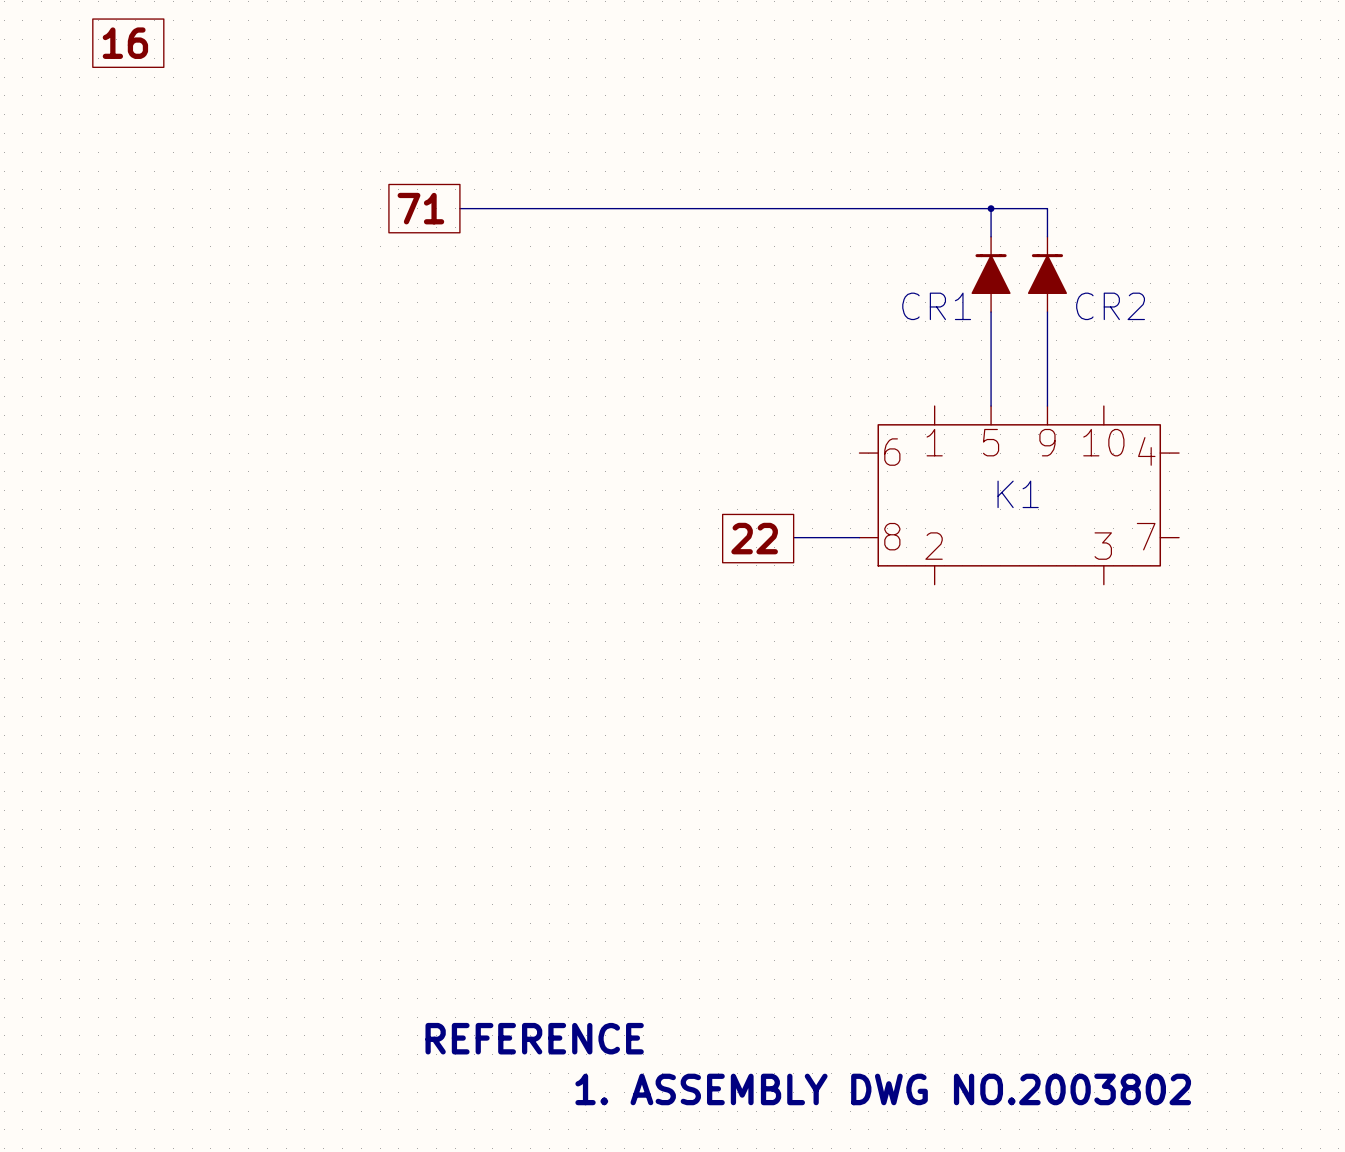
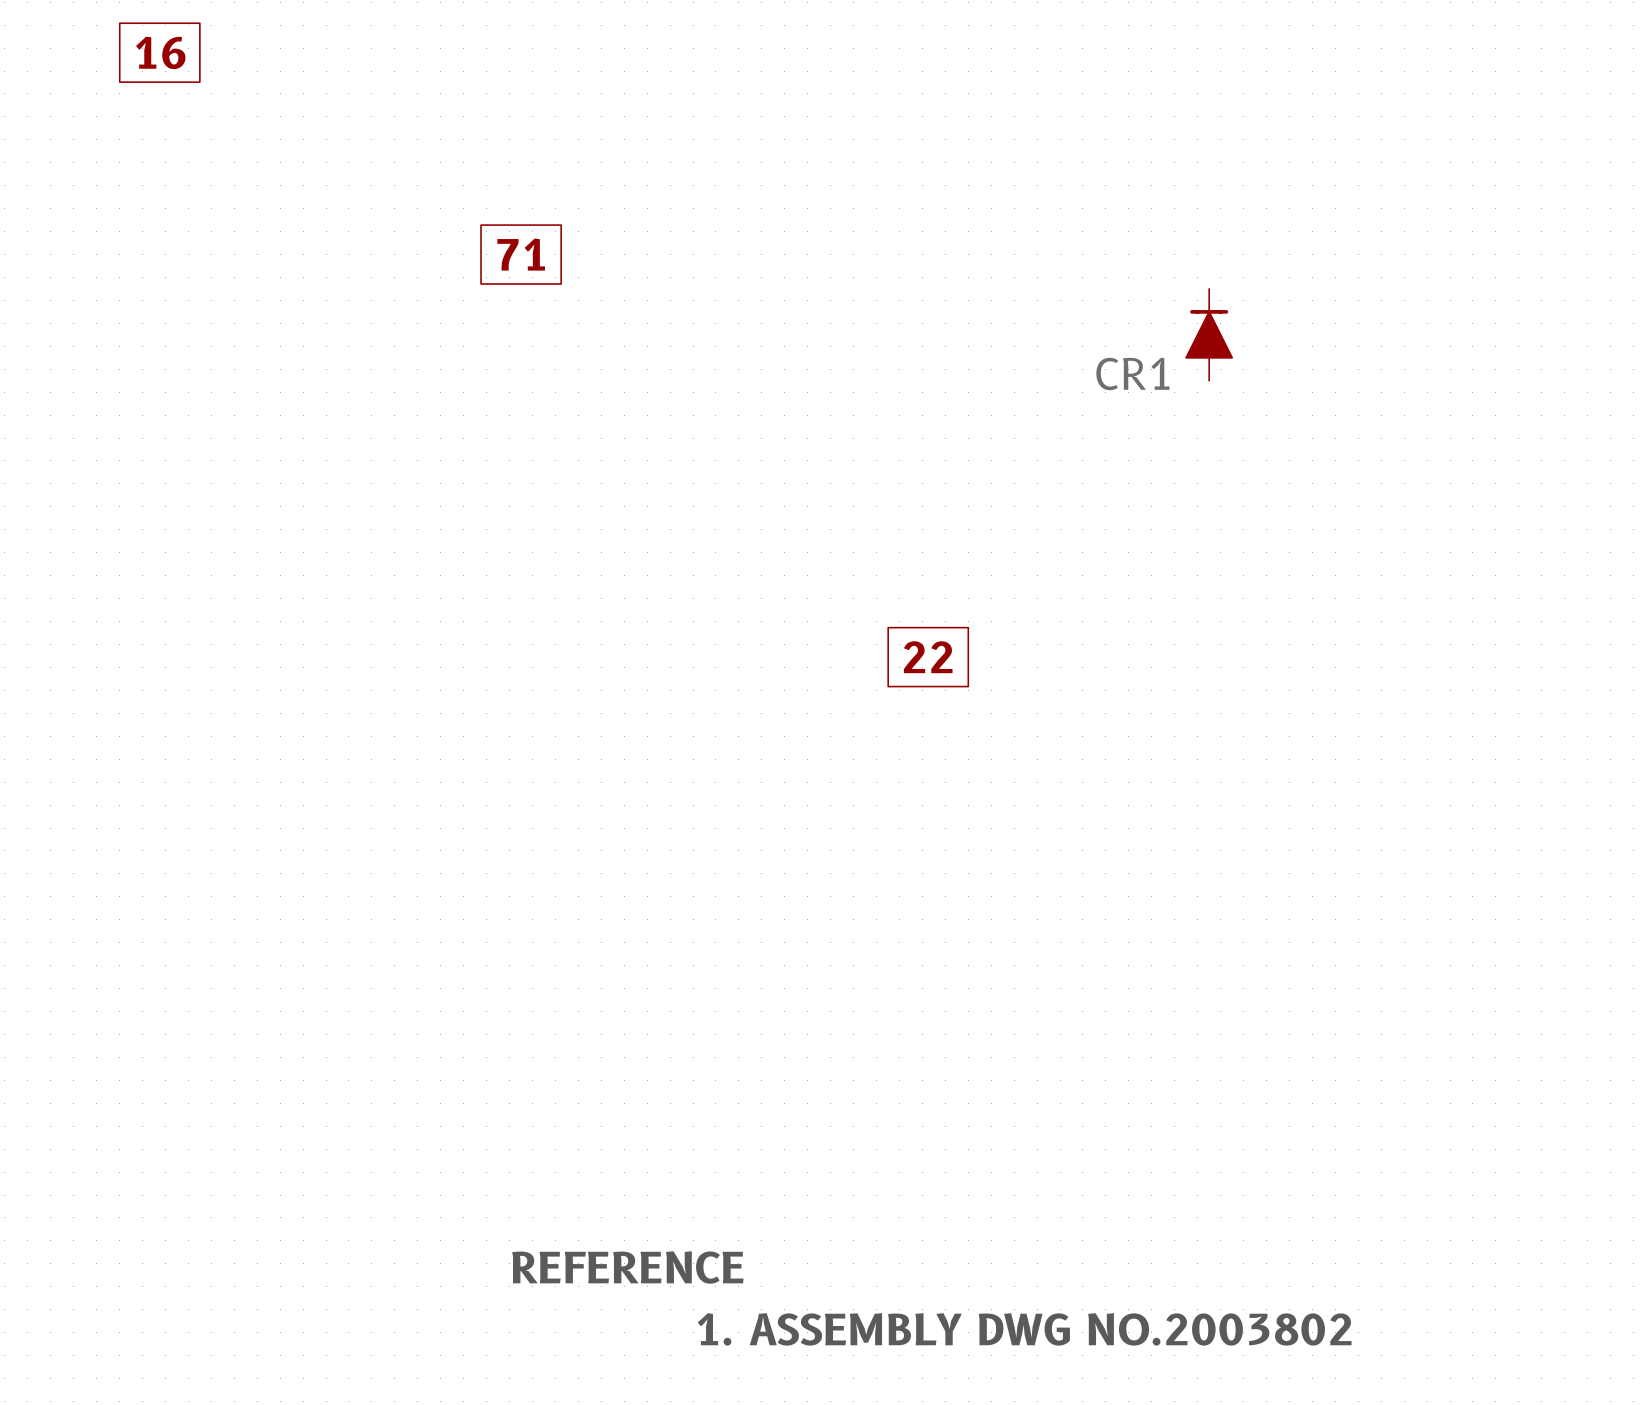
wire: (459, 208) (1047, 208) (1047, 236) -> none
wire: (991, 208) (991, 236) -> none
junction: (991, 208) -> none
CR2: (1047, 274) -> none
wire: (991, 312) (991, 406) -> none
wire: (1047, 312) (1047, 406) -> none
K1: (1019, 495) -> none
wire: (793, 537) (859, 537) -> none

